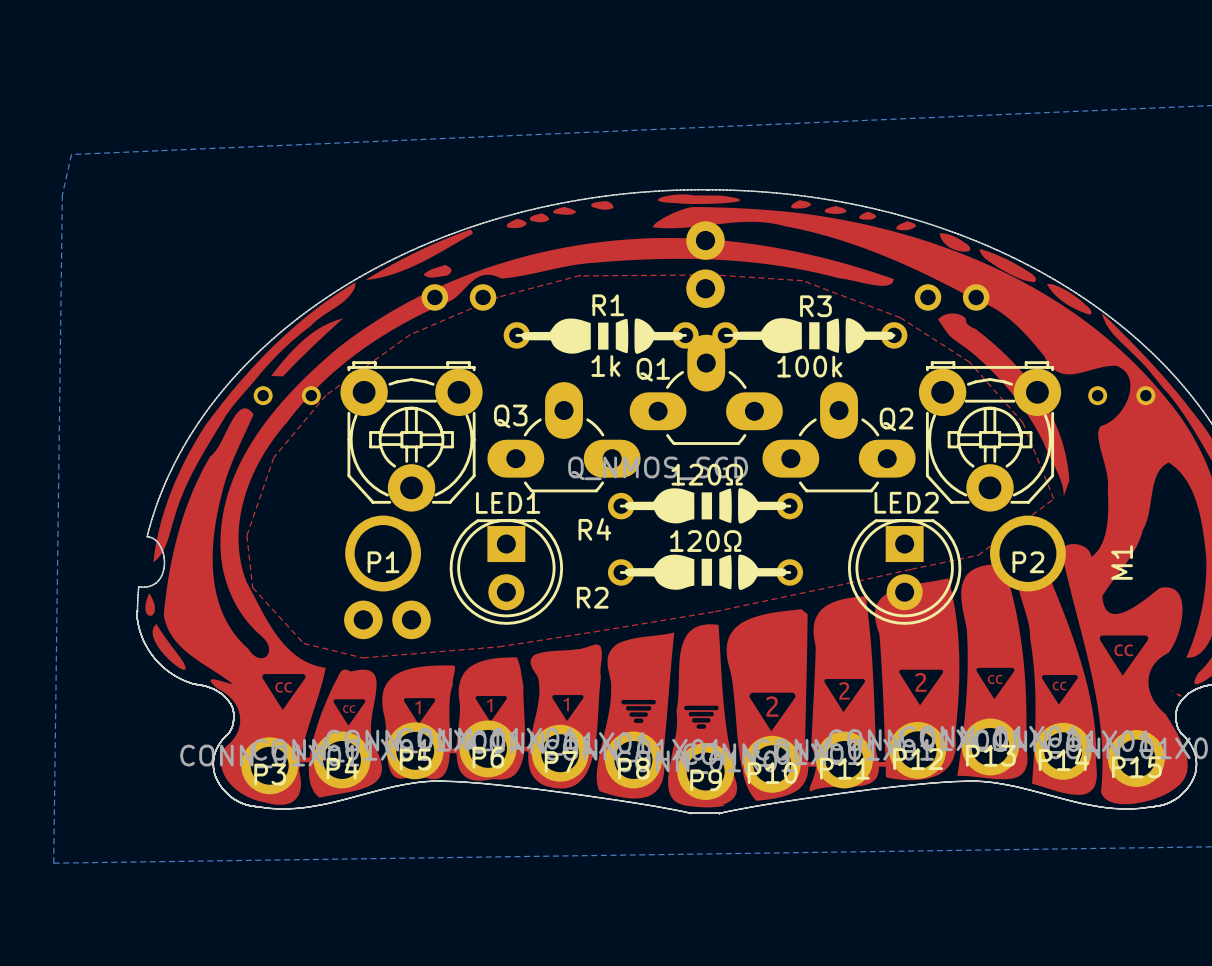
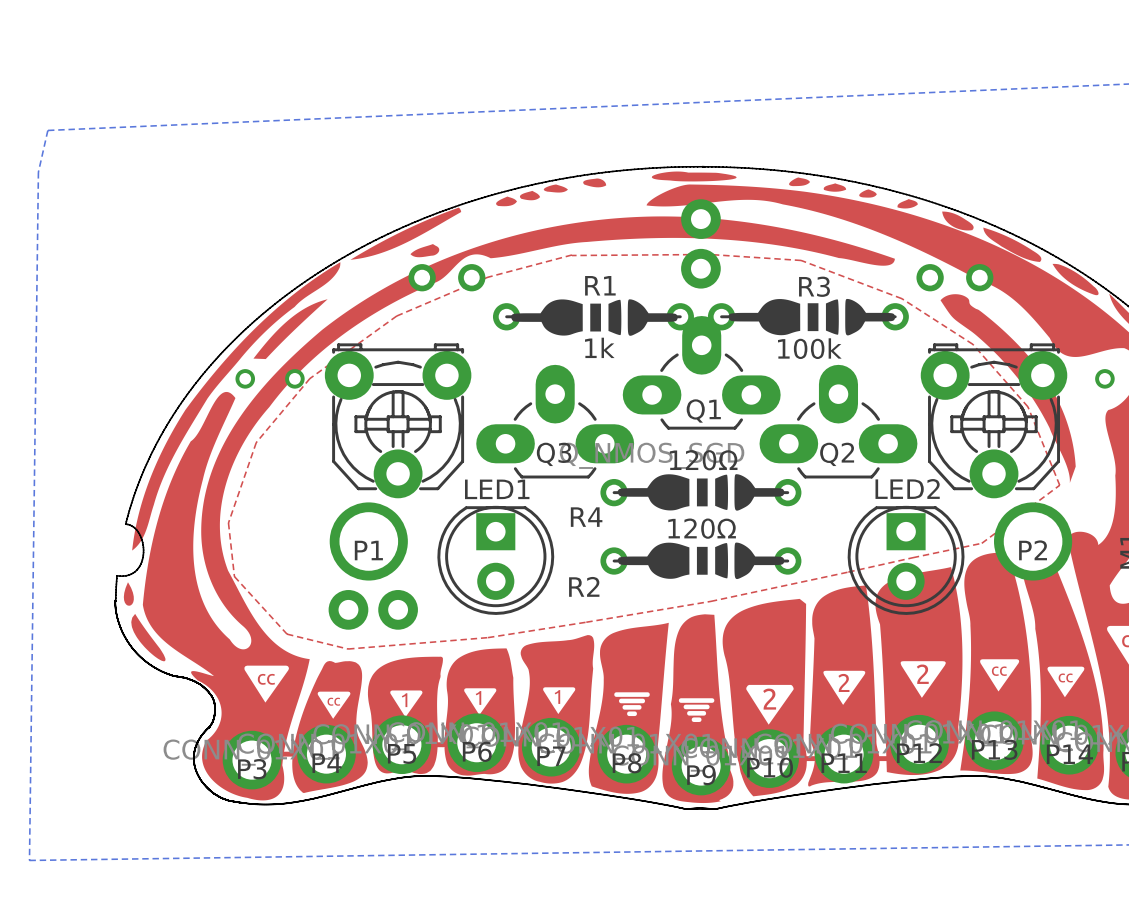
Q1 name position: Q1 (653, 369) -> Q1 (703, 411)
Q3 name position: Q3 (510, 416) -> Q3 (554, 454)
Q2 name position: Q2 (896, 419) -> Q2 (837, 454)

